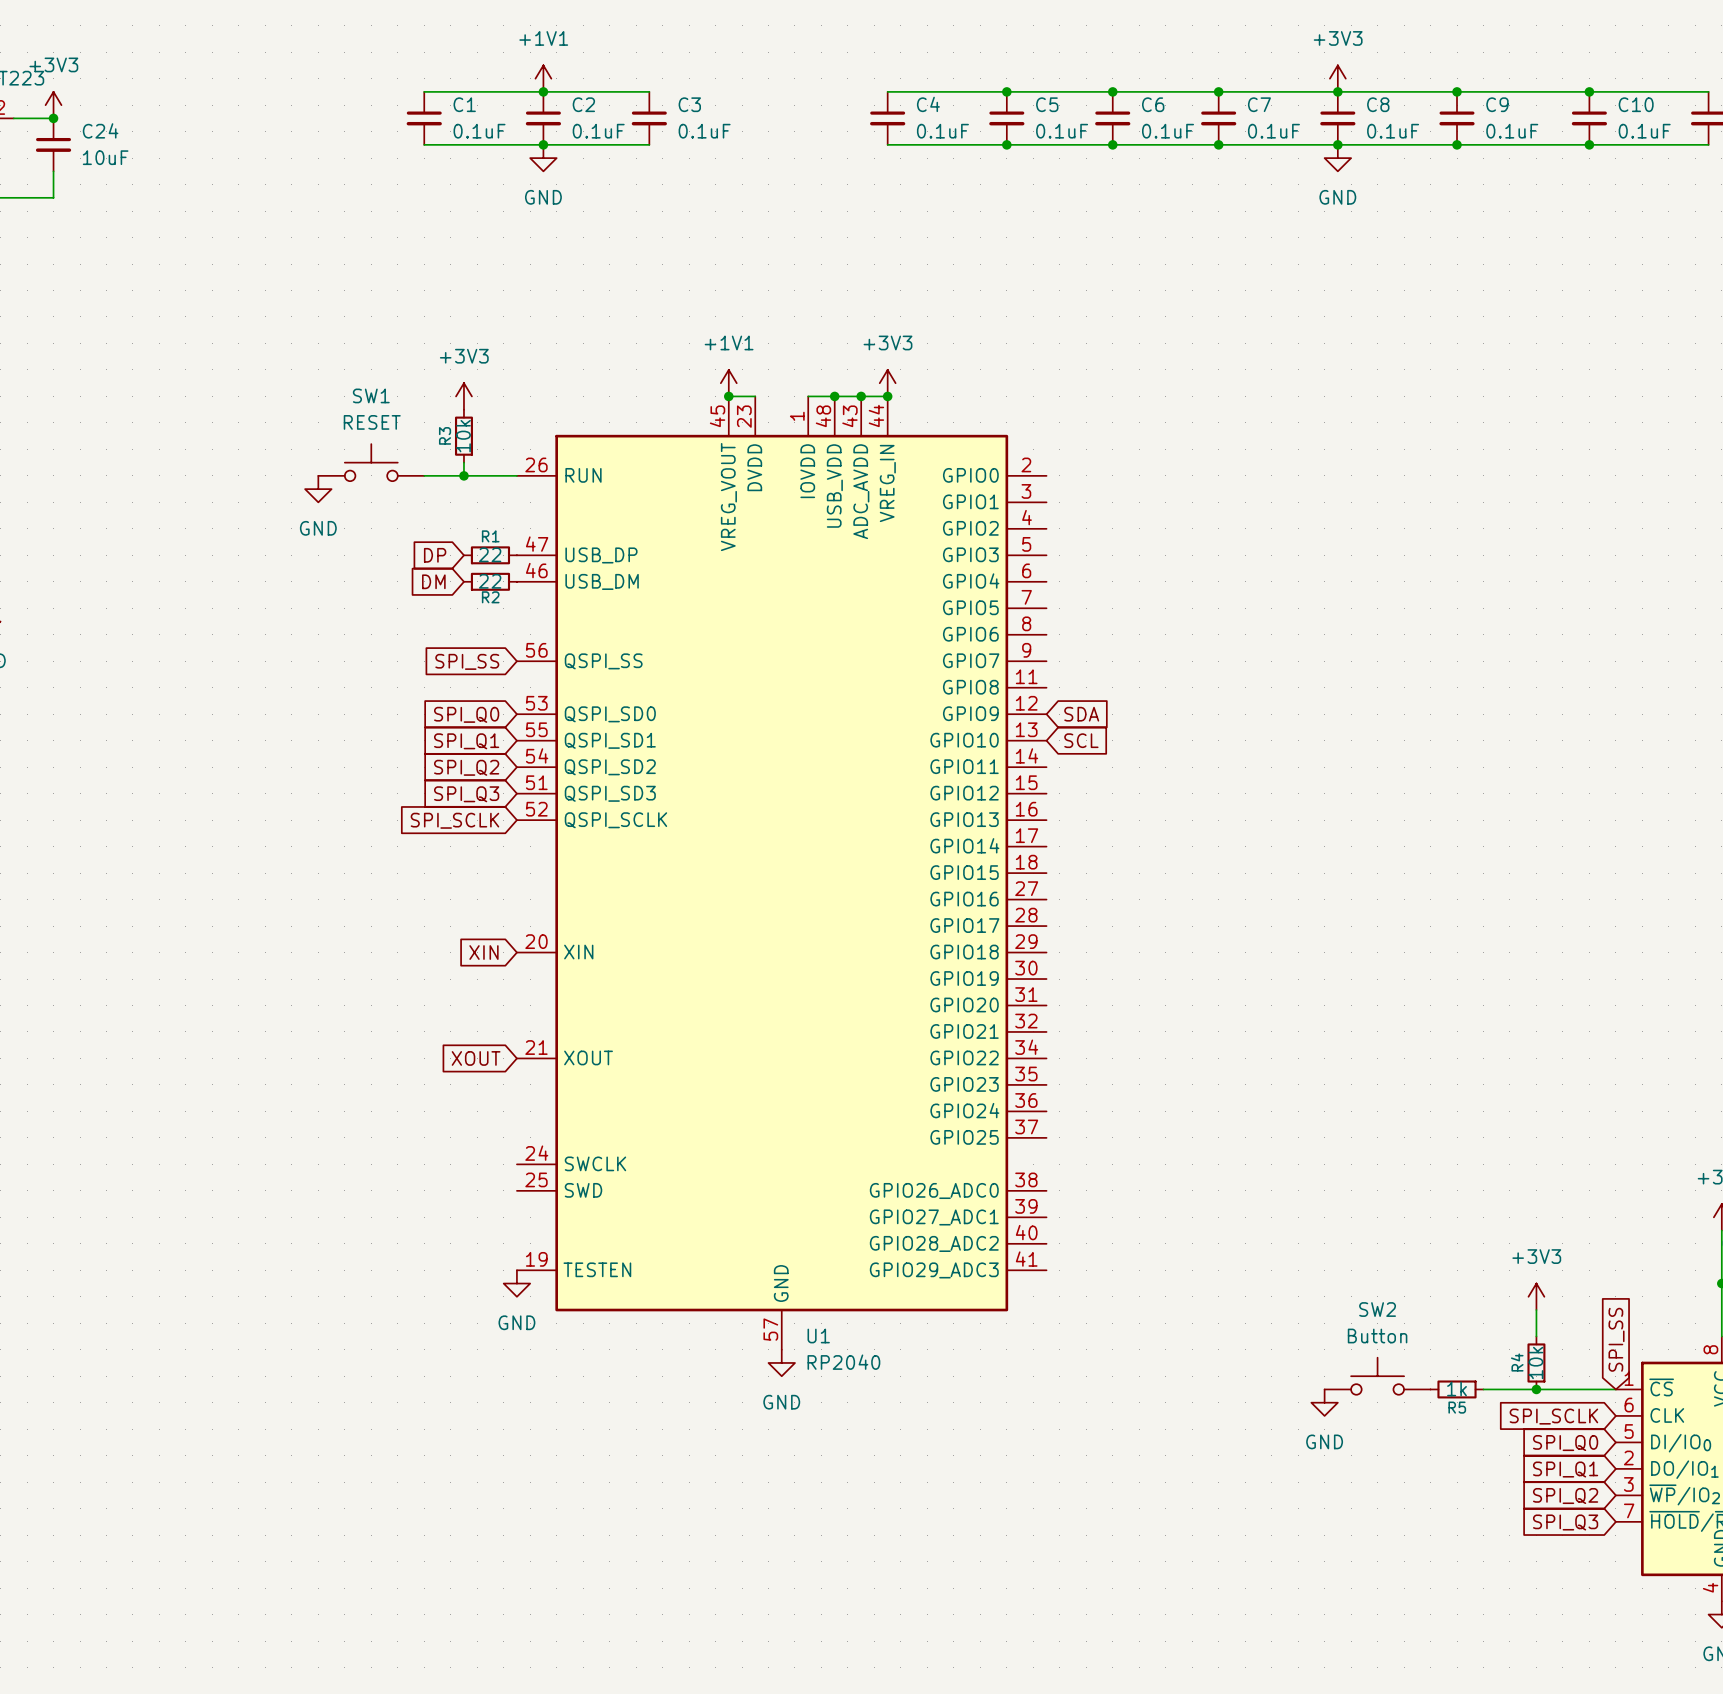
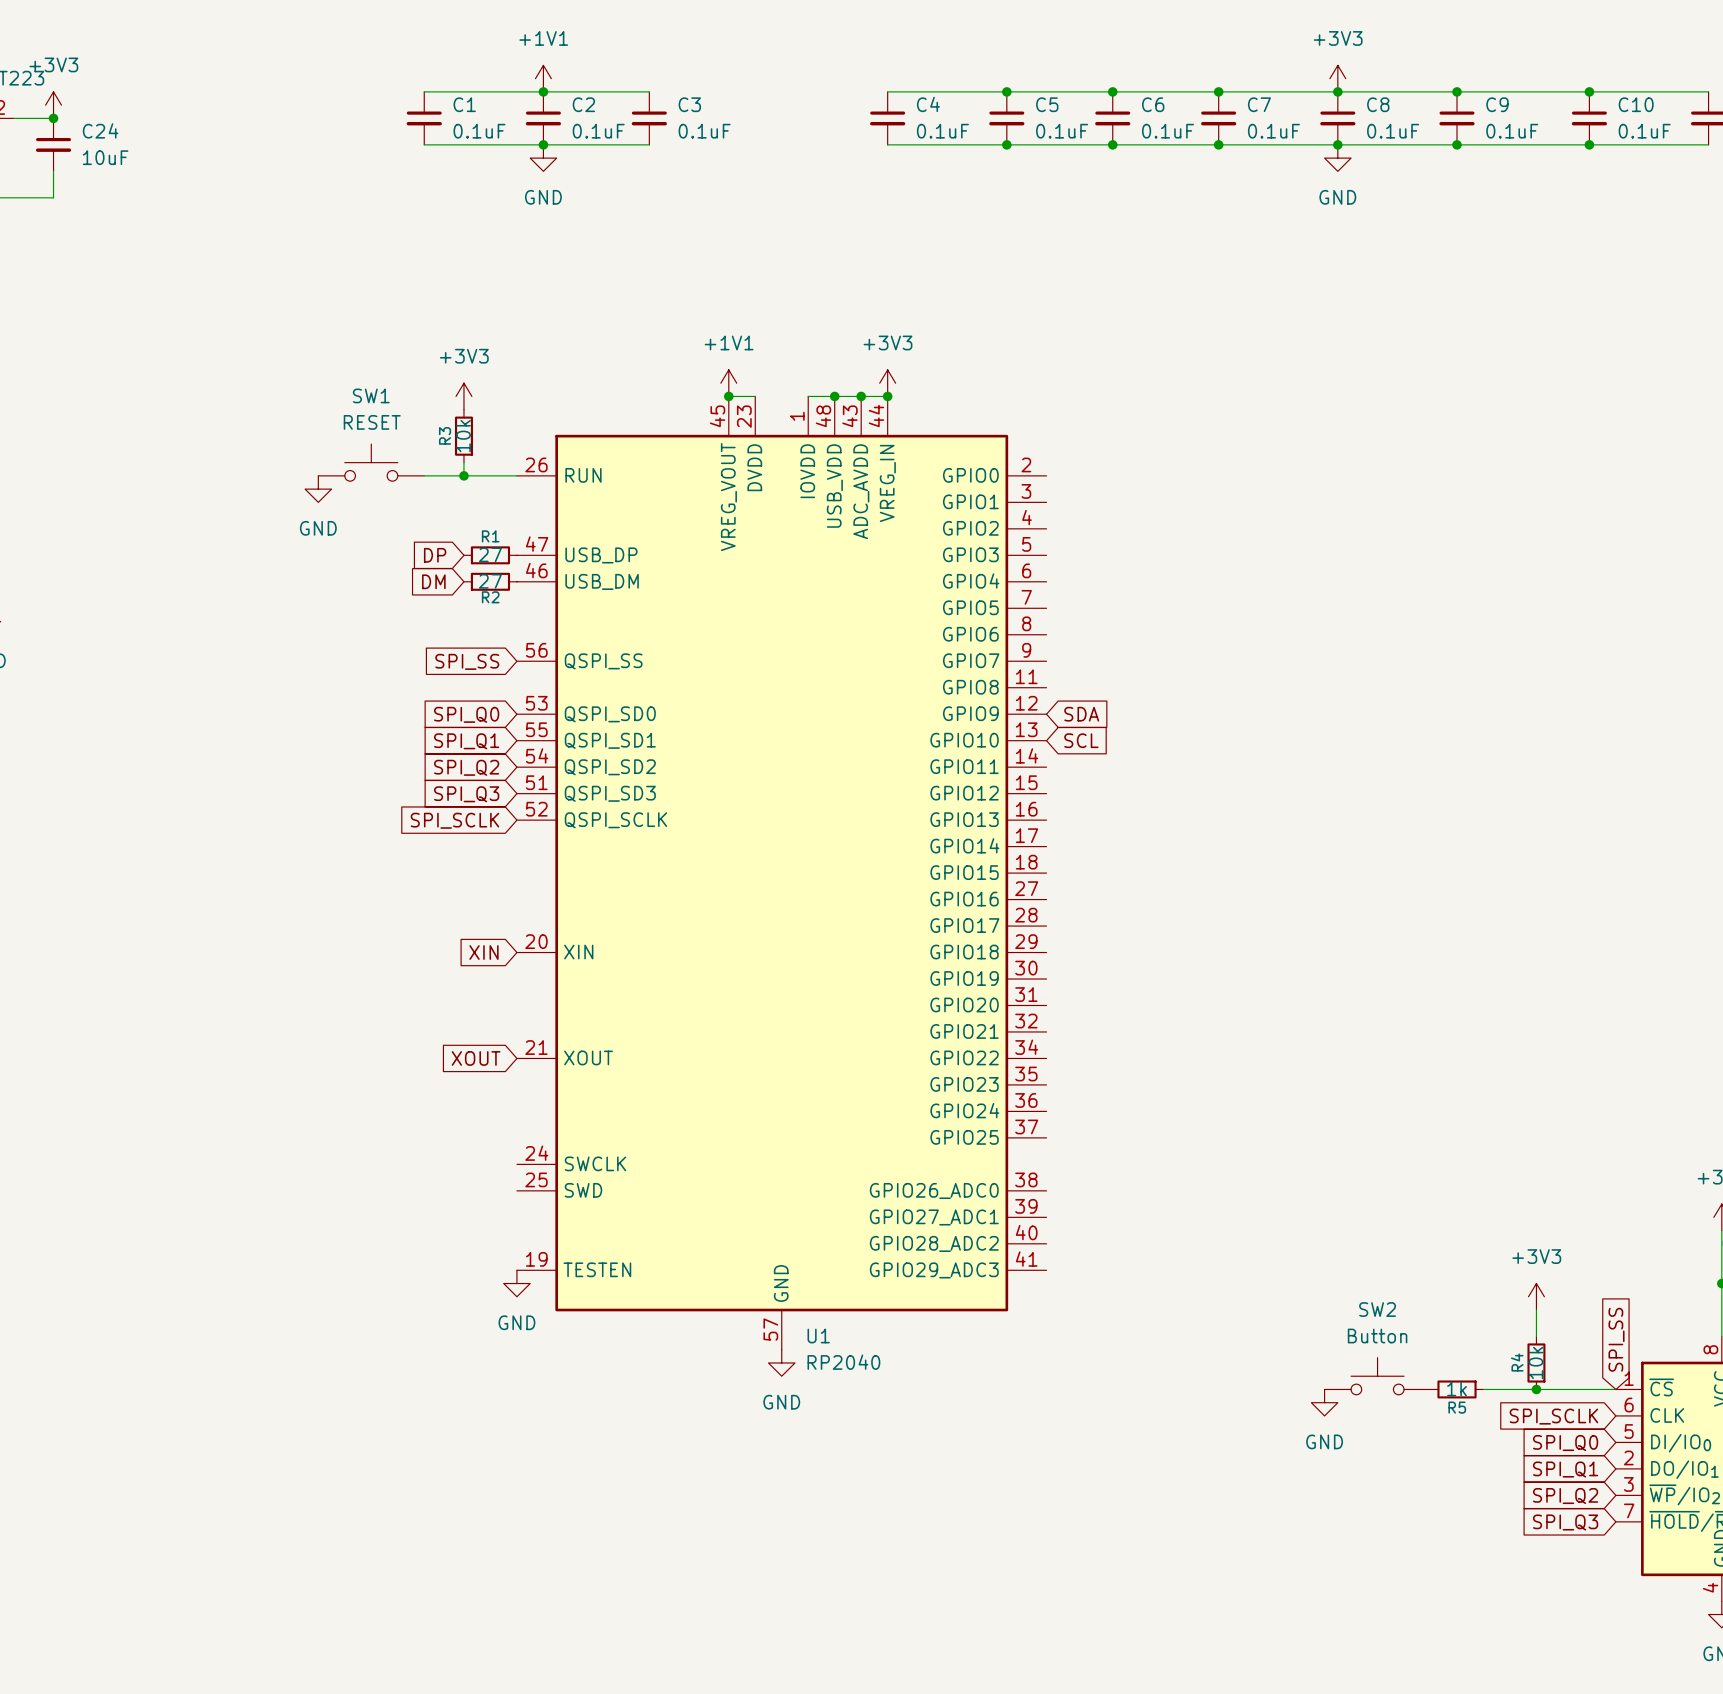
R1 value: 22 (490, 554) -> 27 (490, 554)
R2 value: 22 (490, 581) -> 27 (490, 581)

